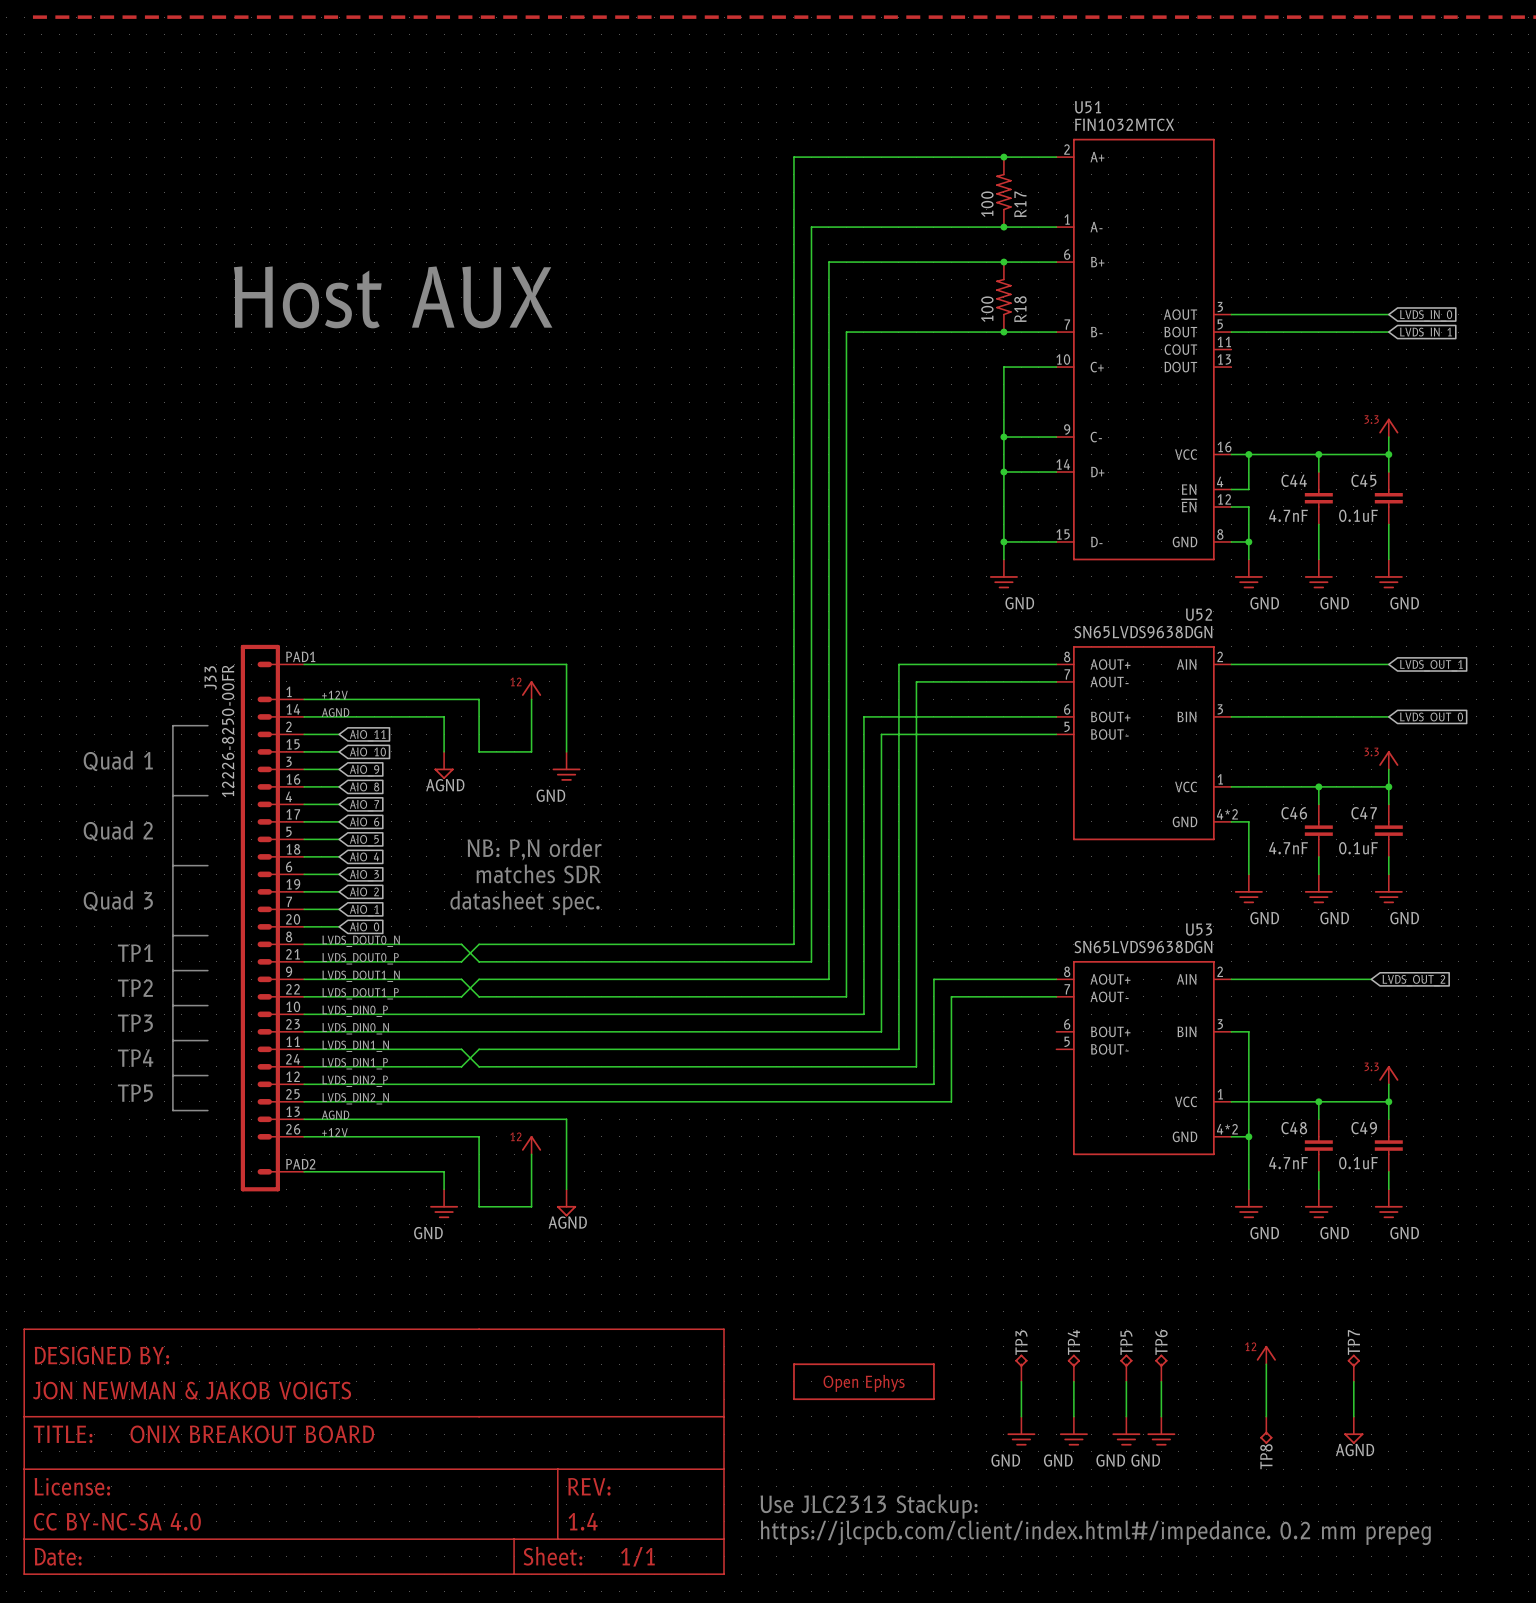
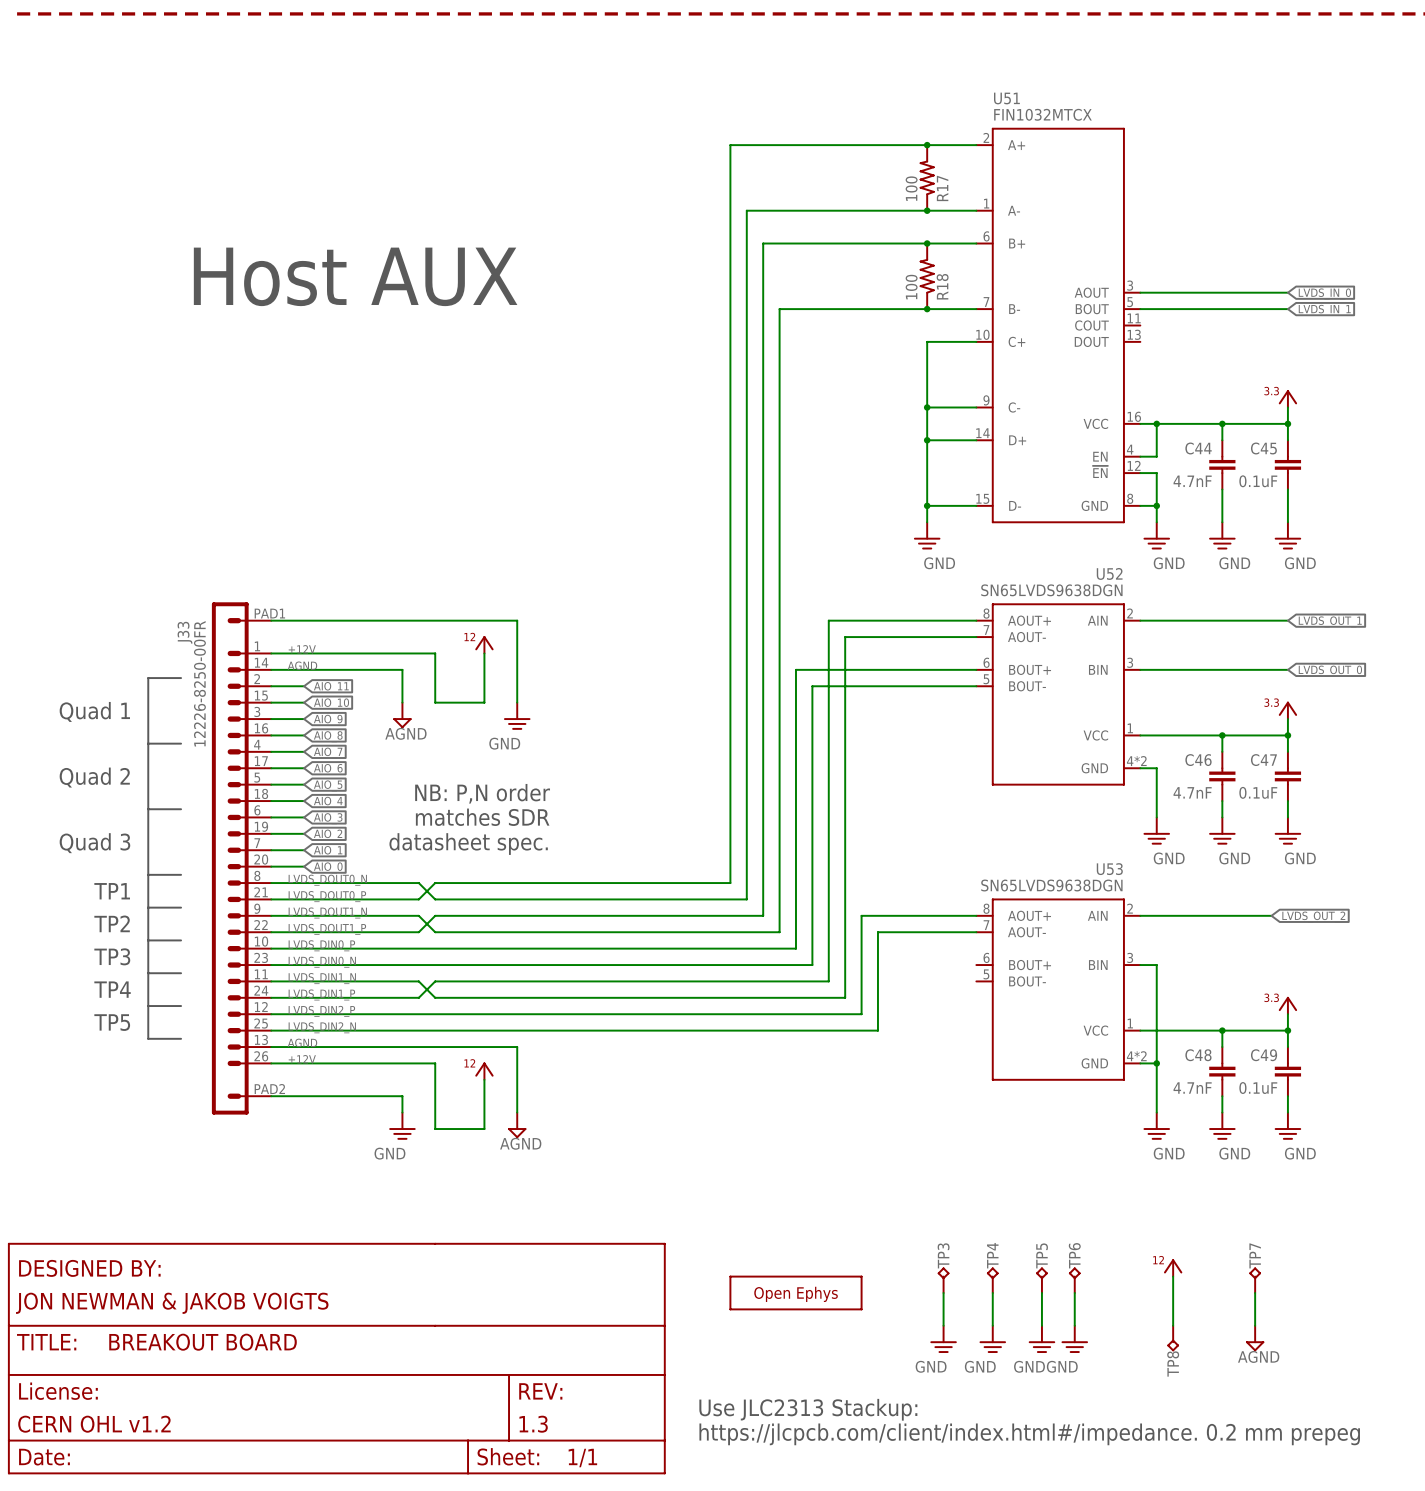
part text: ONIX BREAKOUT BOARD (252, 1434) -> BREAKOUT BOARD (203, 1342)
part text: CC BY-NC-SA 4.0 (117, 1521) -> CERN OHL v1.2 (94, 1424)
part text: 1.4 (583, 1521) -> 1.3 (533, 1424)

